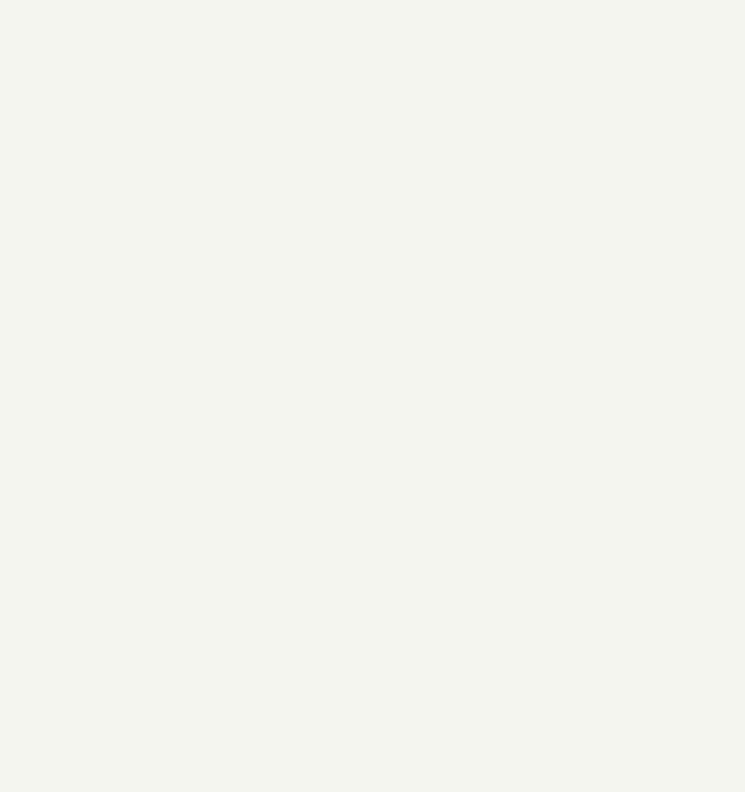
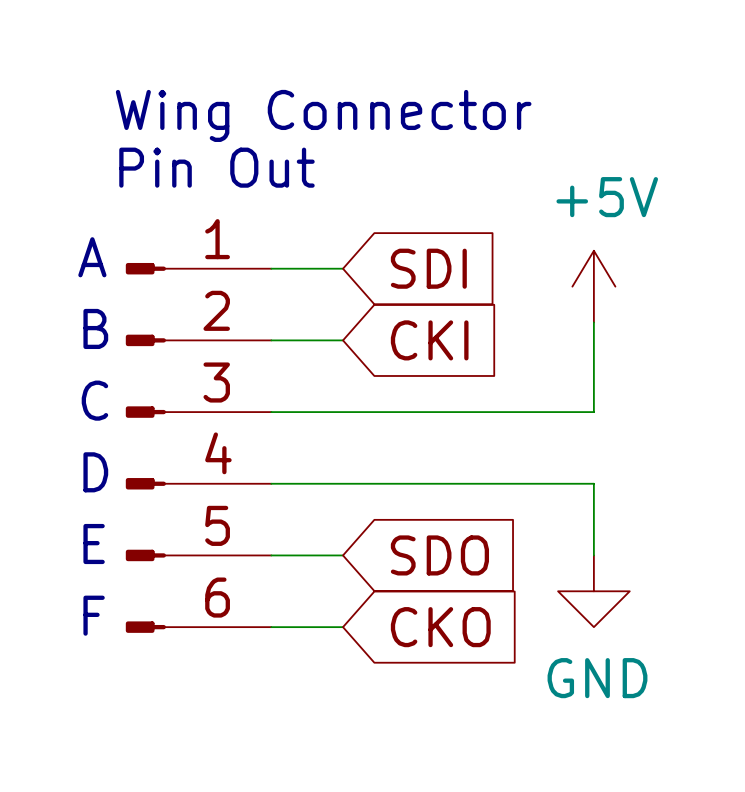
text: none -> Wing Connector (323, 115)
text: none -> Pin Out (216, 167)
text: none -> A (92, 257)
wire: none -> (271, 268) (343, 268)
global label: none -> SDI (428, 268)
power symbol: none -> +5V (593, 286)
wire: none -> (593, 322) (593, 412) (271, 412)
text: none -> B (95, 328)
wire: none -> (271, 340) (343, 340)
global label: none -> CKI (429, 340)
text: none -> C (94, 400)
part: none -> (198, 447)
text: none -> D (95, 472)
wire: none -> (271, 483) (593, 483) (593, 555)
text: none -> E (94, 544)
wire: none -> (271, 555) (343, 555)
global label: none -> SDO (439, 555)
power symbol: none -> GND (593, 591)
text: none -> F (94, 615)
wire: none -> (271, 627) (343, 627)
global label: none -> CKO (440, 627)

